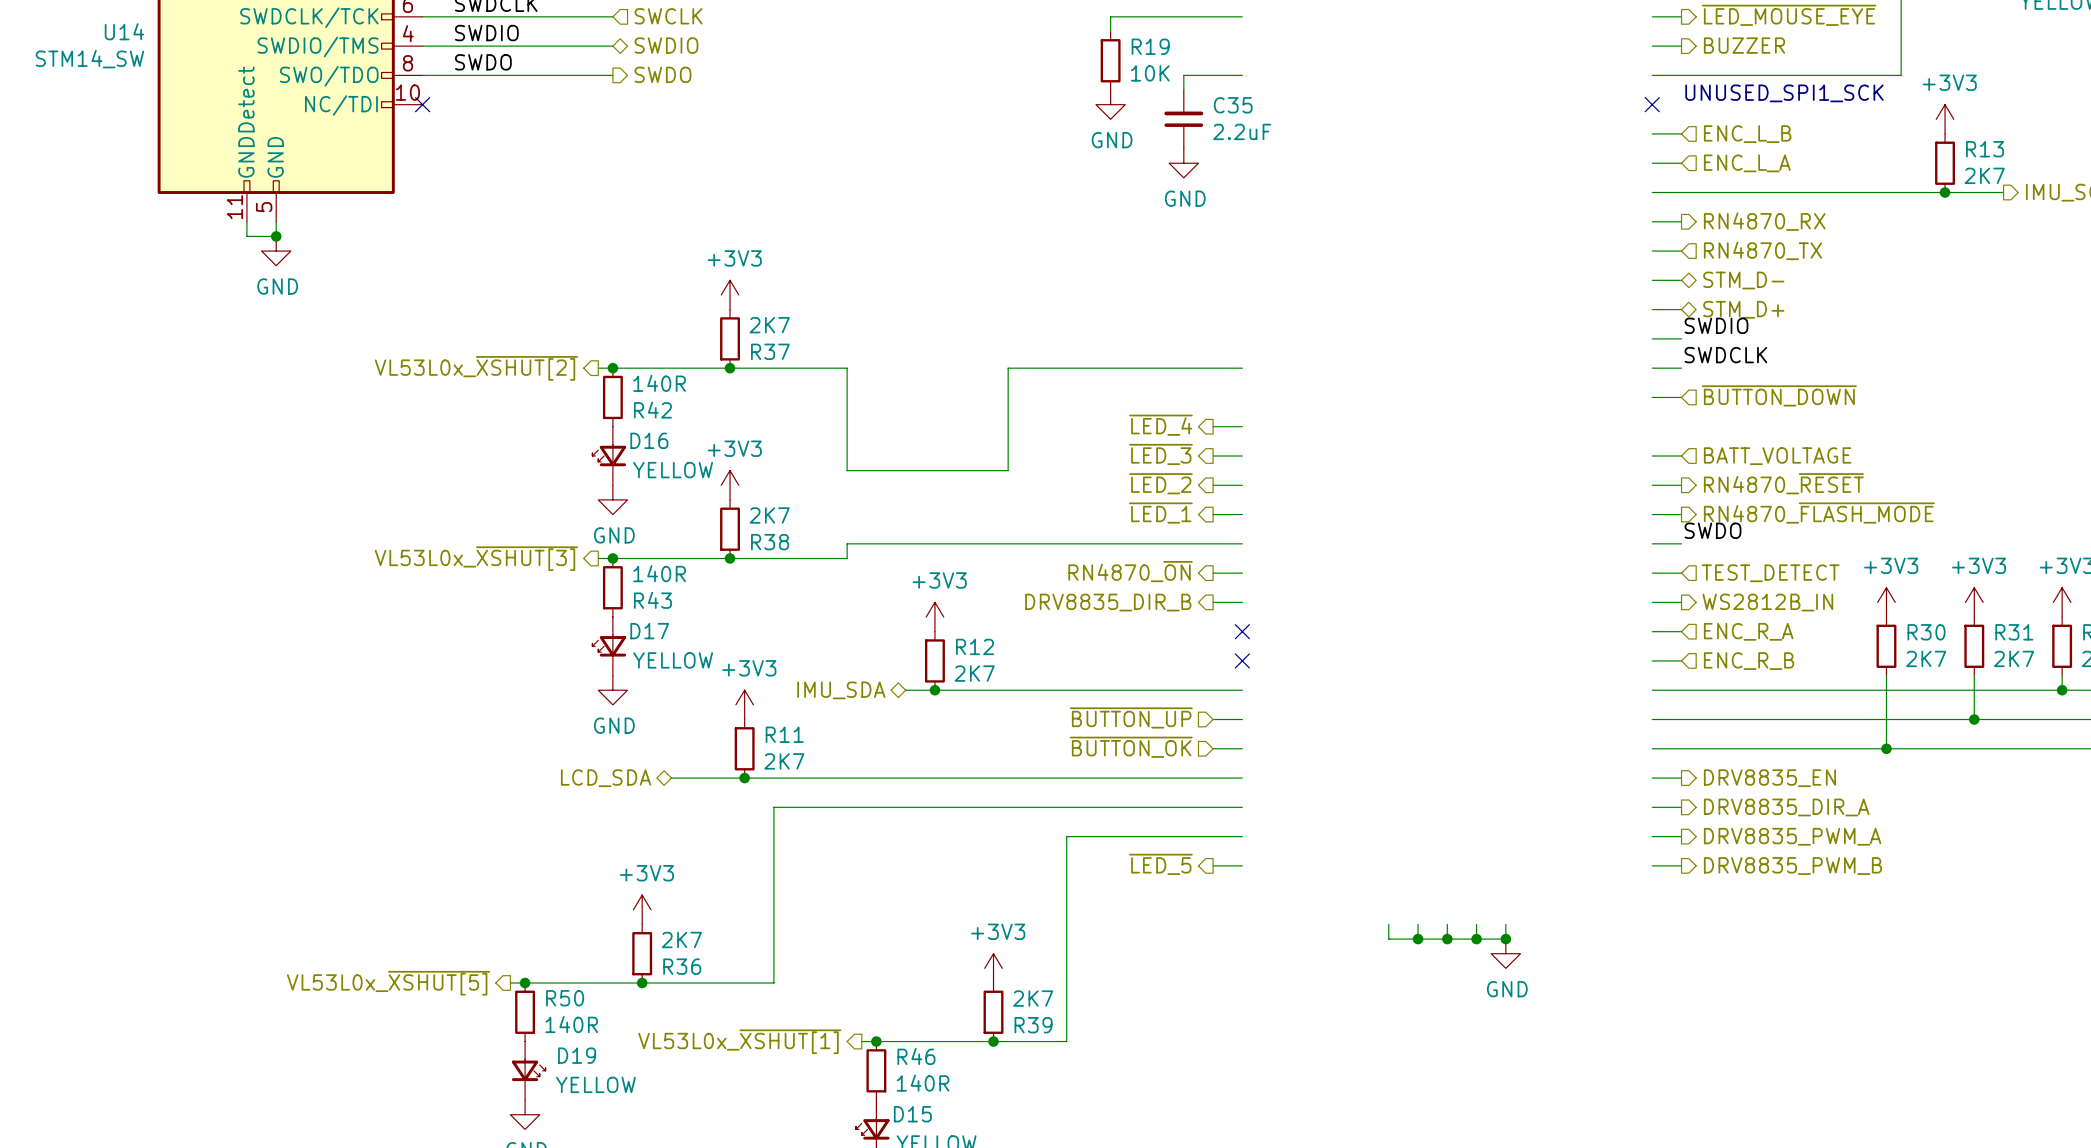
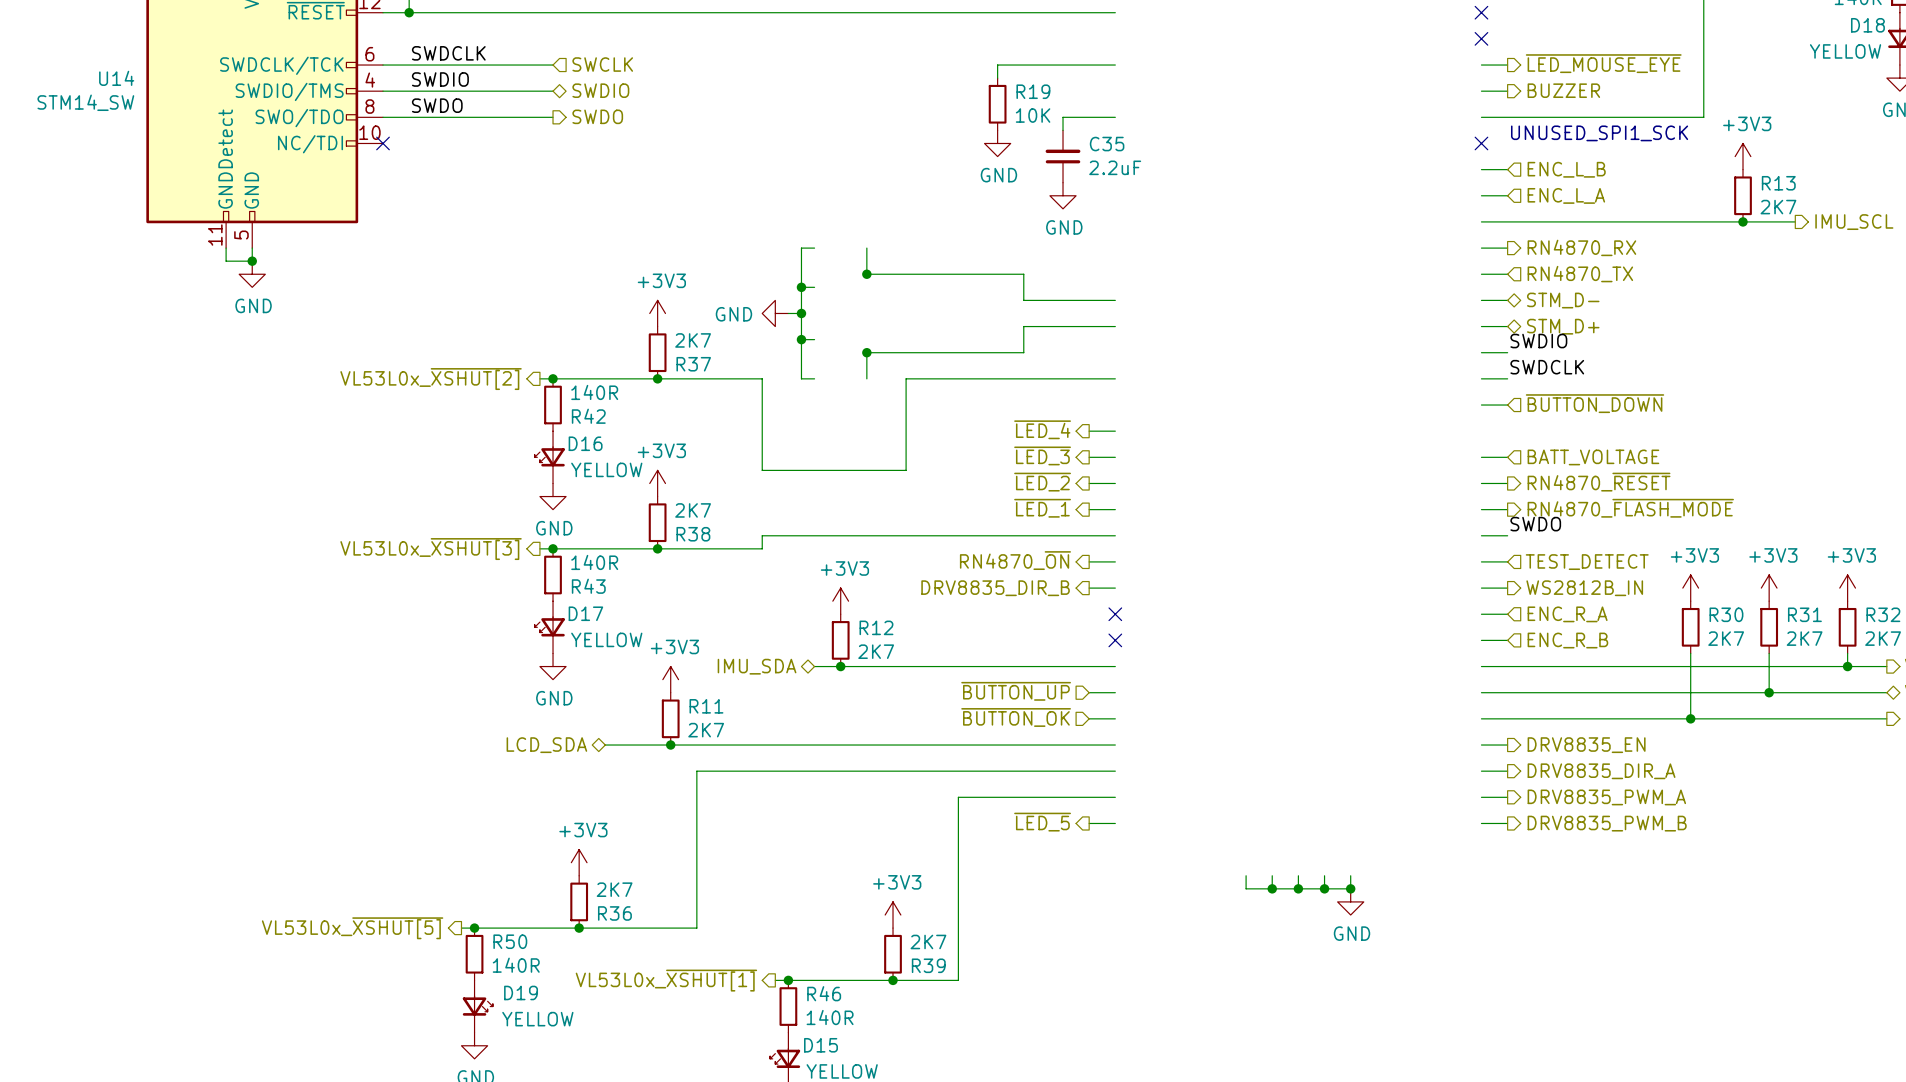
wire: none -> (814, 248) (801, 248) (801, 378) (814, 378)
wire: none -> (866, 248) (866, 274) (1023, 274) (1023, 300) (1115, 300)
junction: none -> (866, 274)
wire: none -> (801, 287) (814, 287)
junction: none -> (801, 287)
power symbol: none -> GND (775, 313)
wire: none -> (788, 313) (801, 313)
junction: none -> (801, 313)
wire: none -> (1115, 326) (1023, 326) (1023, 352) (866, 352) (866, 378)
wire: none -> (801, 339) (814, 339)
junction: none -> (801, 339)
junction: none -> (866, 352)

